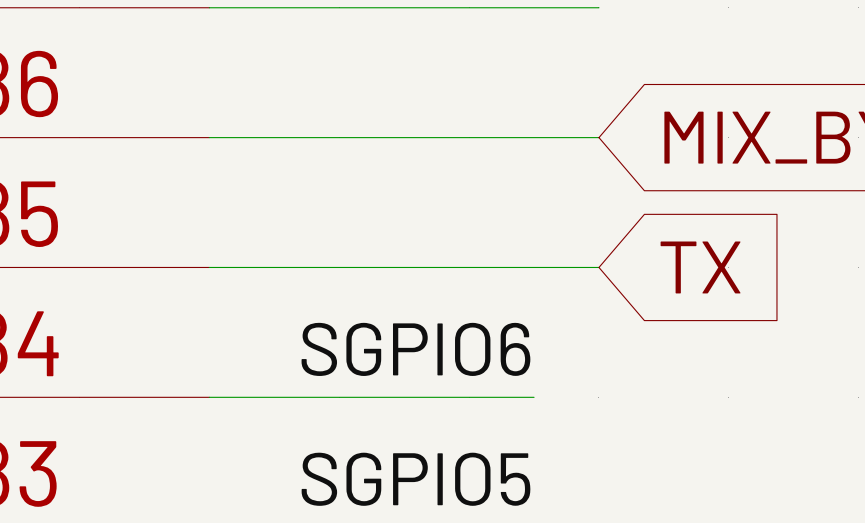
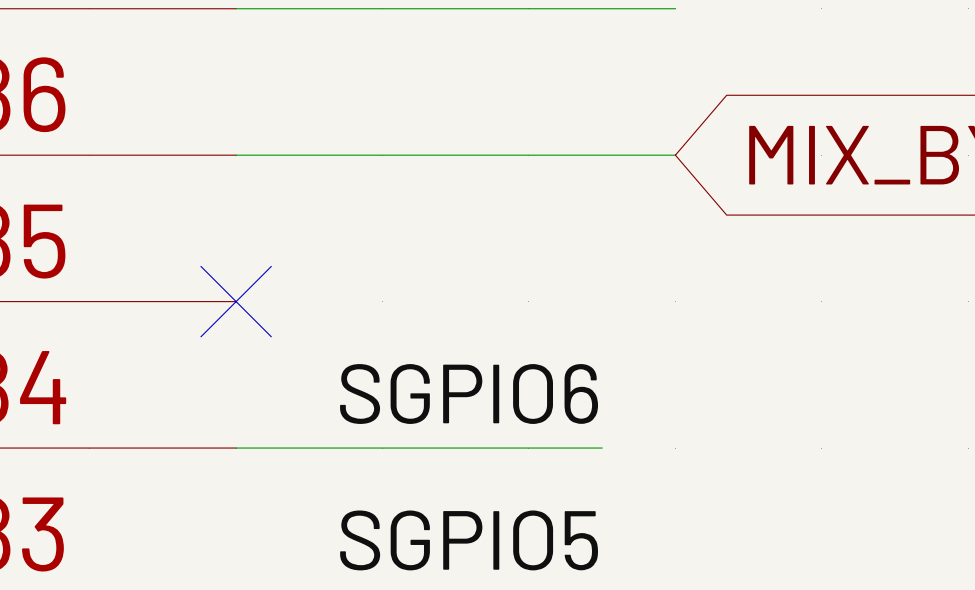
wire: (209, 267) (598, 267) -> none
no-connect mark: none -> (236, 301)
global label: TX (700, 267) -> none

